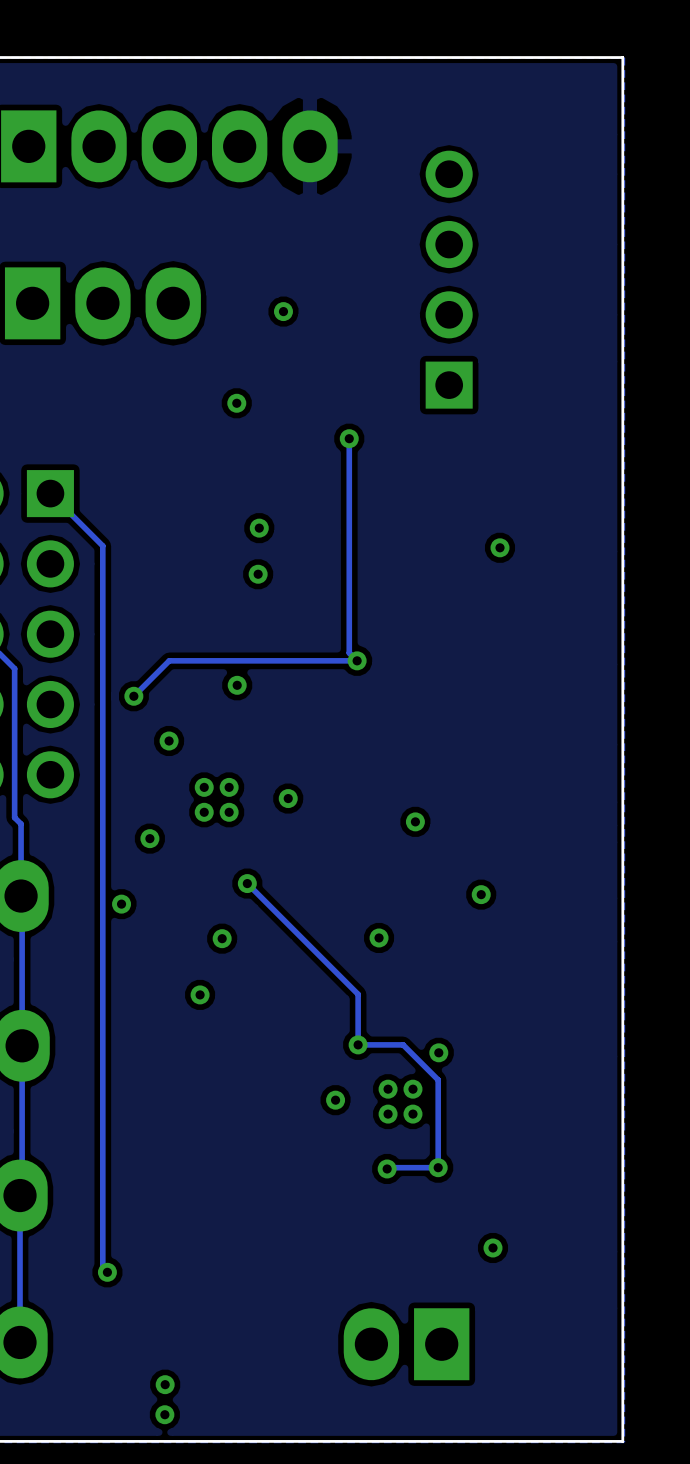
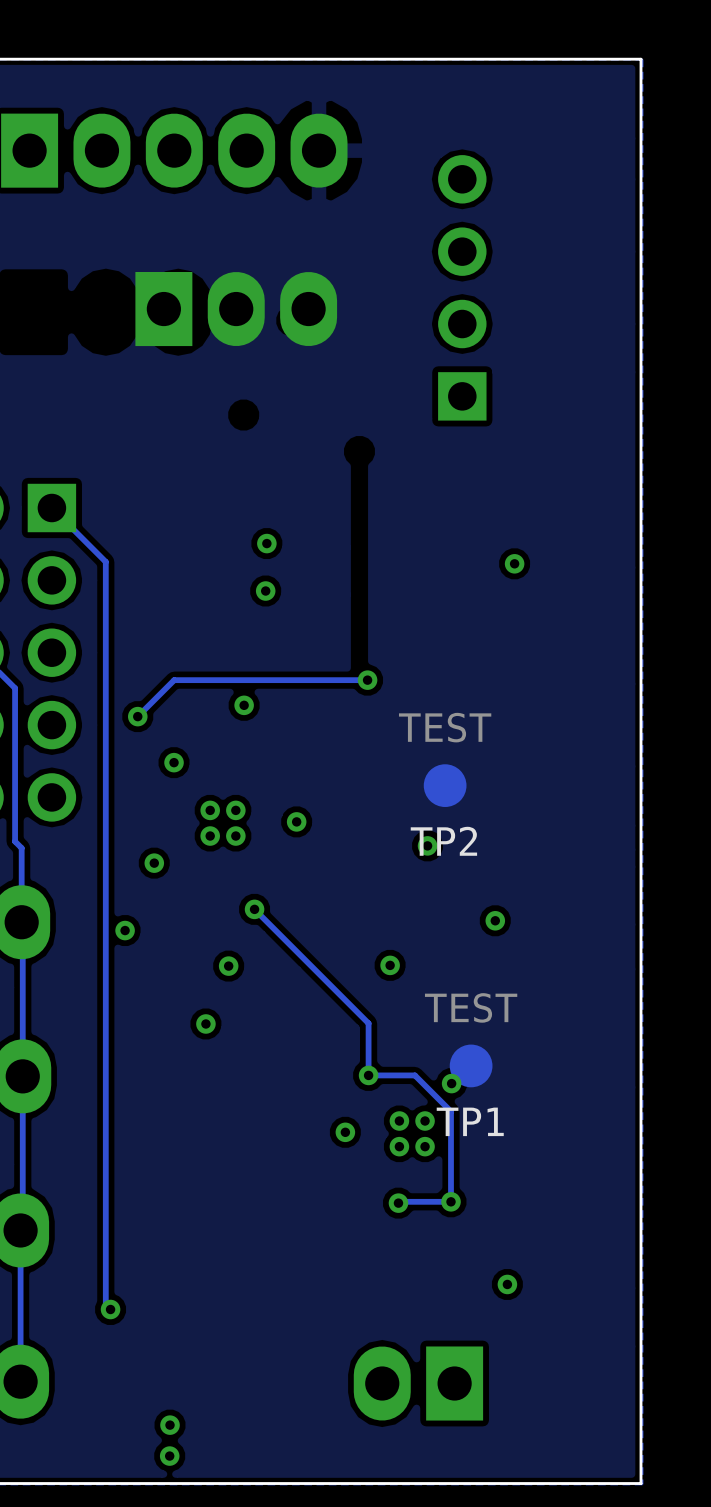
part position: (102, 303) -> (236, 309)
via: (283, 311) -> none
via: (236, 403) -> none
track: (349, 438) (349, 652) (357, 660) -> none
via: (349, 438) -> none
TP2: none -> TEST (445, 785)
TP1: none -> TEST (471, 1065)

